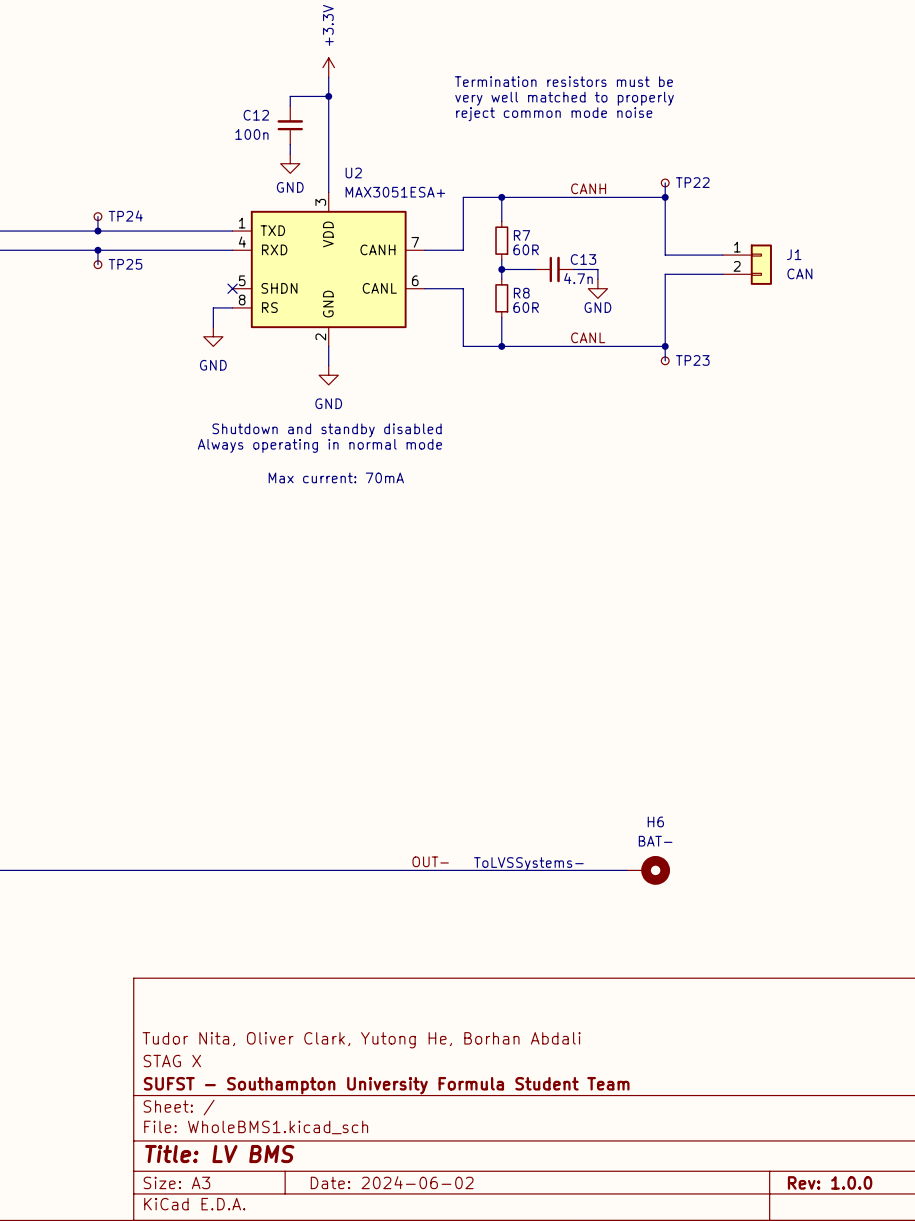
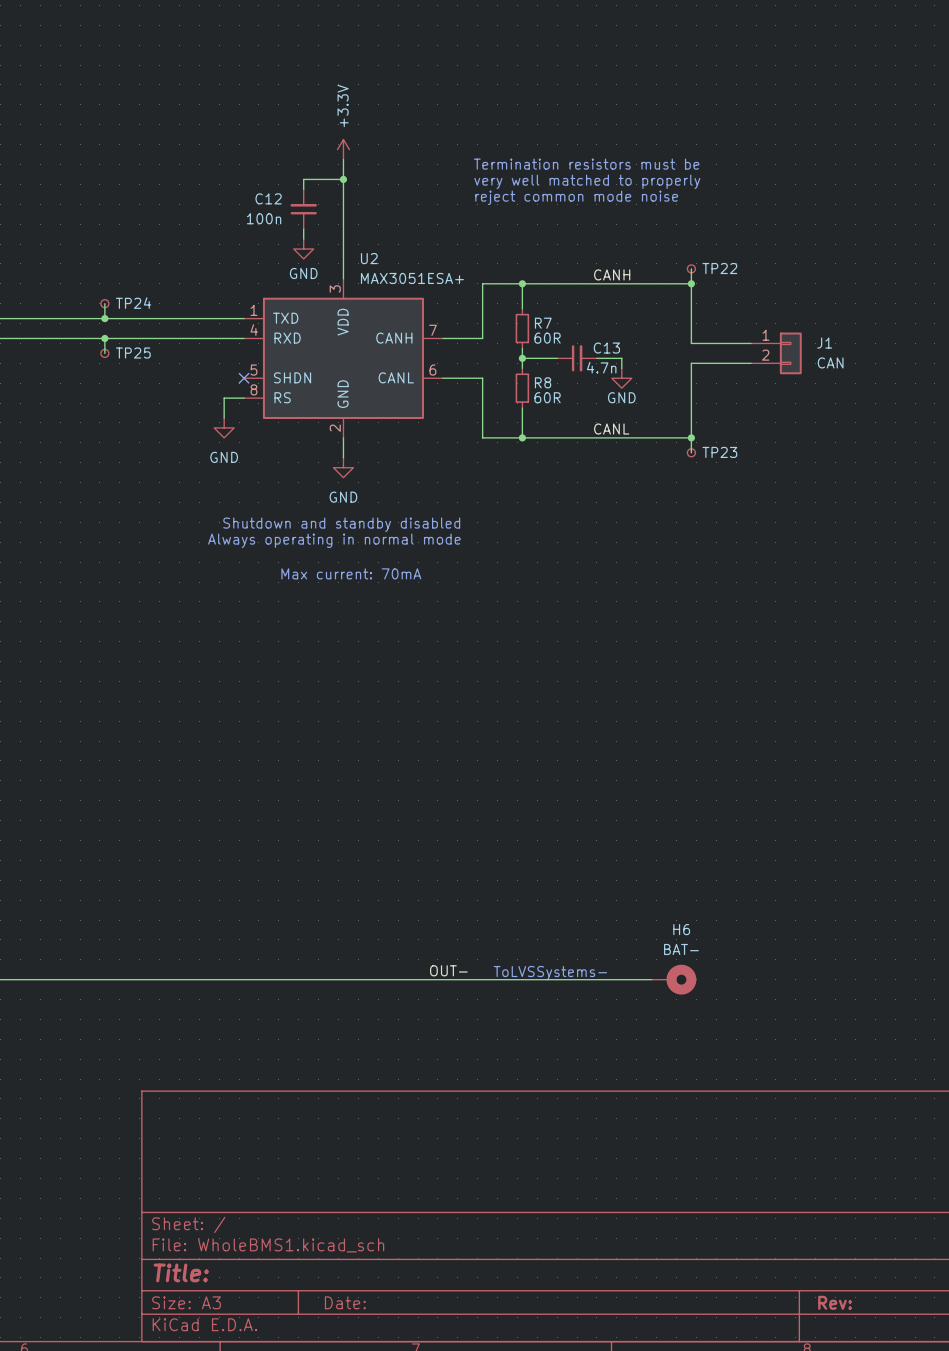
title block: Tudor Nita, Oliver Clark, Yutong He, Borhan Abdali (361, 1040) -> none
title block: STAG X (172, 1061) -> none
title block: SUFST - Southampton University Formula Student Team (386, 1085) -> none
title block: Title: LV BMS (219, 1154) -> Title: (181, 1272)
title block: Date: 2024-06-02 (392, 1182) -> Date: (345, 1302)
title block: Rev: 1.0.0 (830, 1182) -> Rev: (835, 1302)

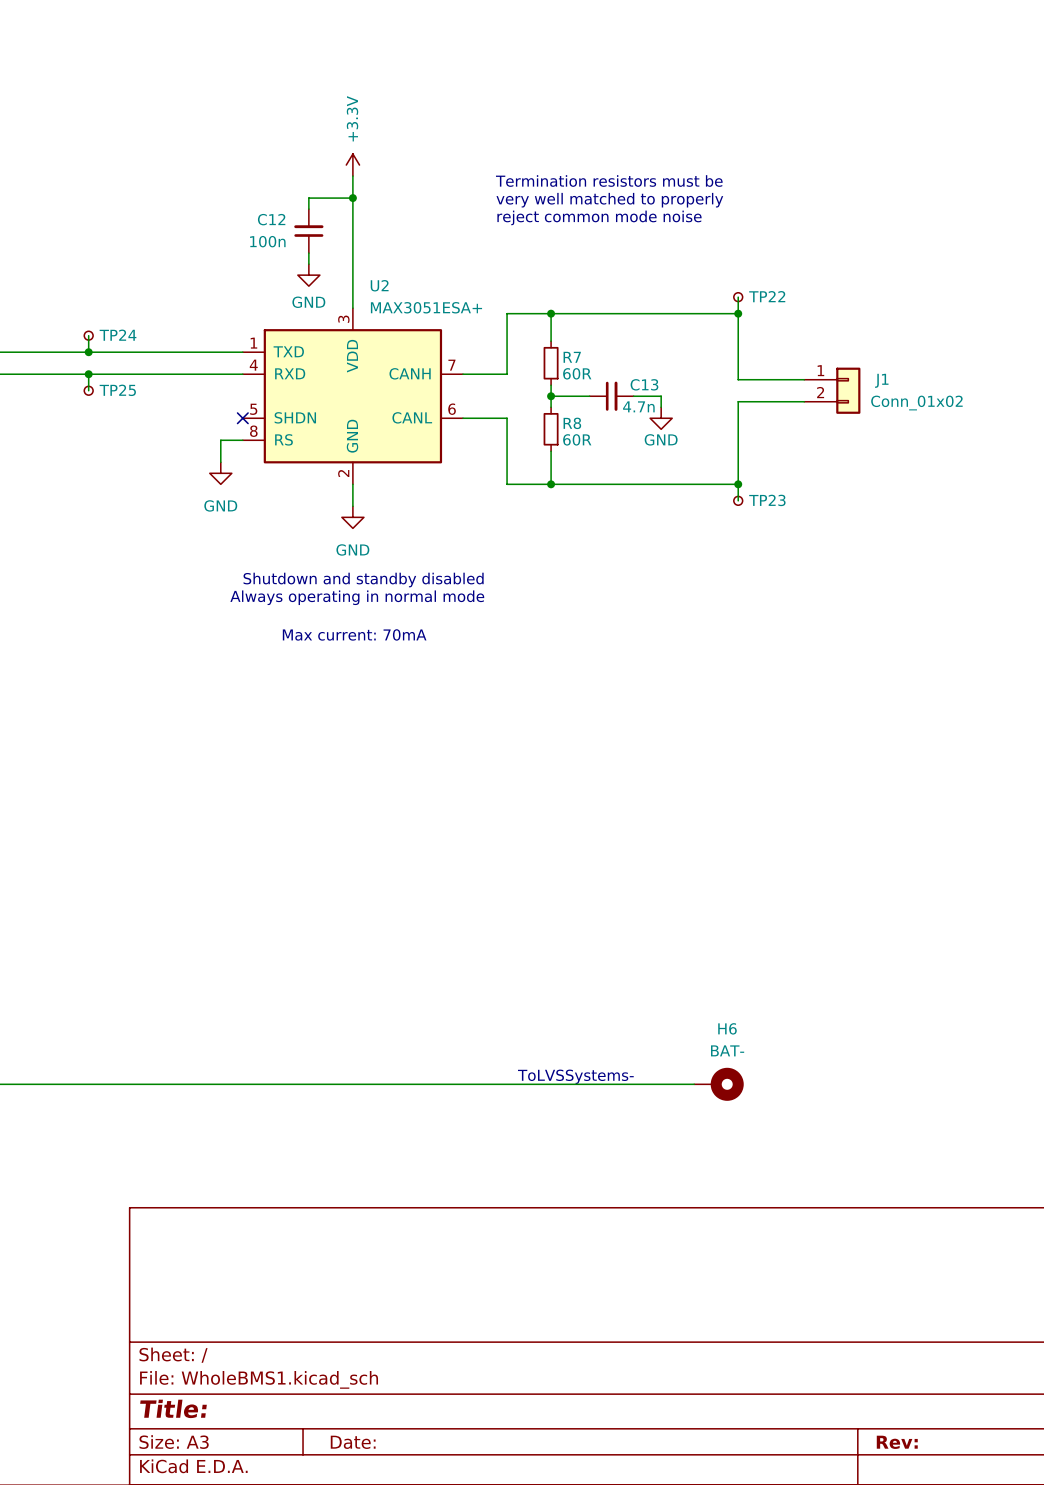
label: CANH (612, 274) -> none
J1 value: CAN (830, 362) -> Conn_01x02 (916, 403)
label: CANL (611, 429) -> none
label: OUT- (448, 970) -> none

